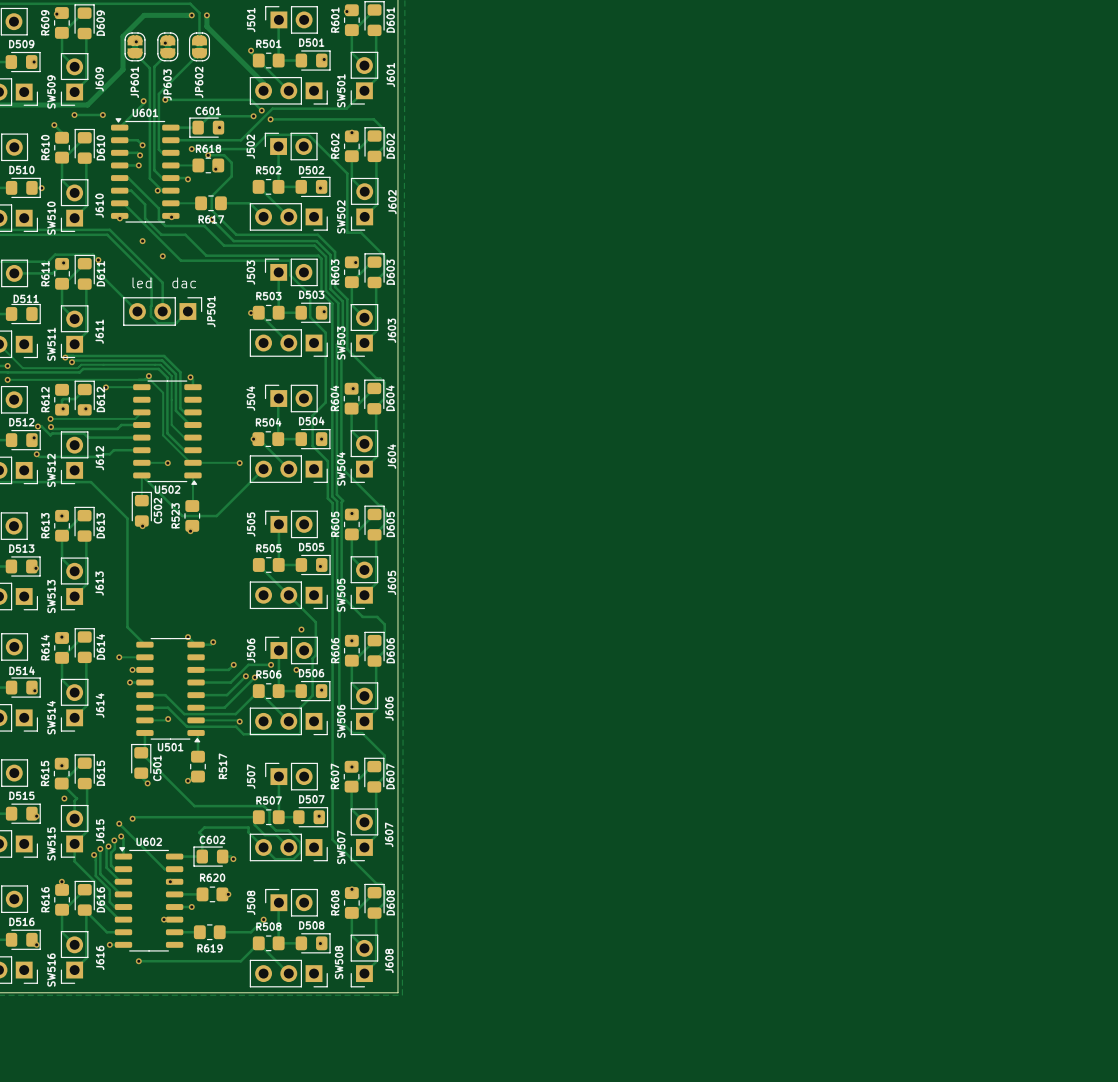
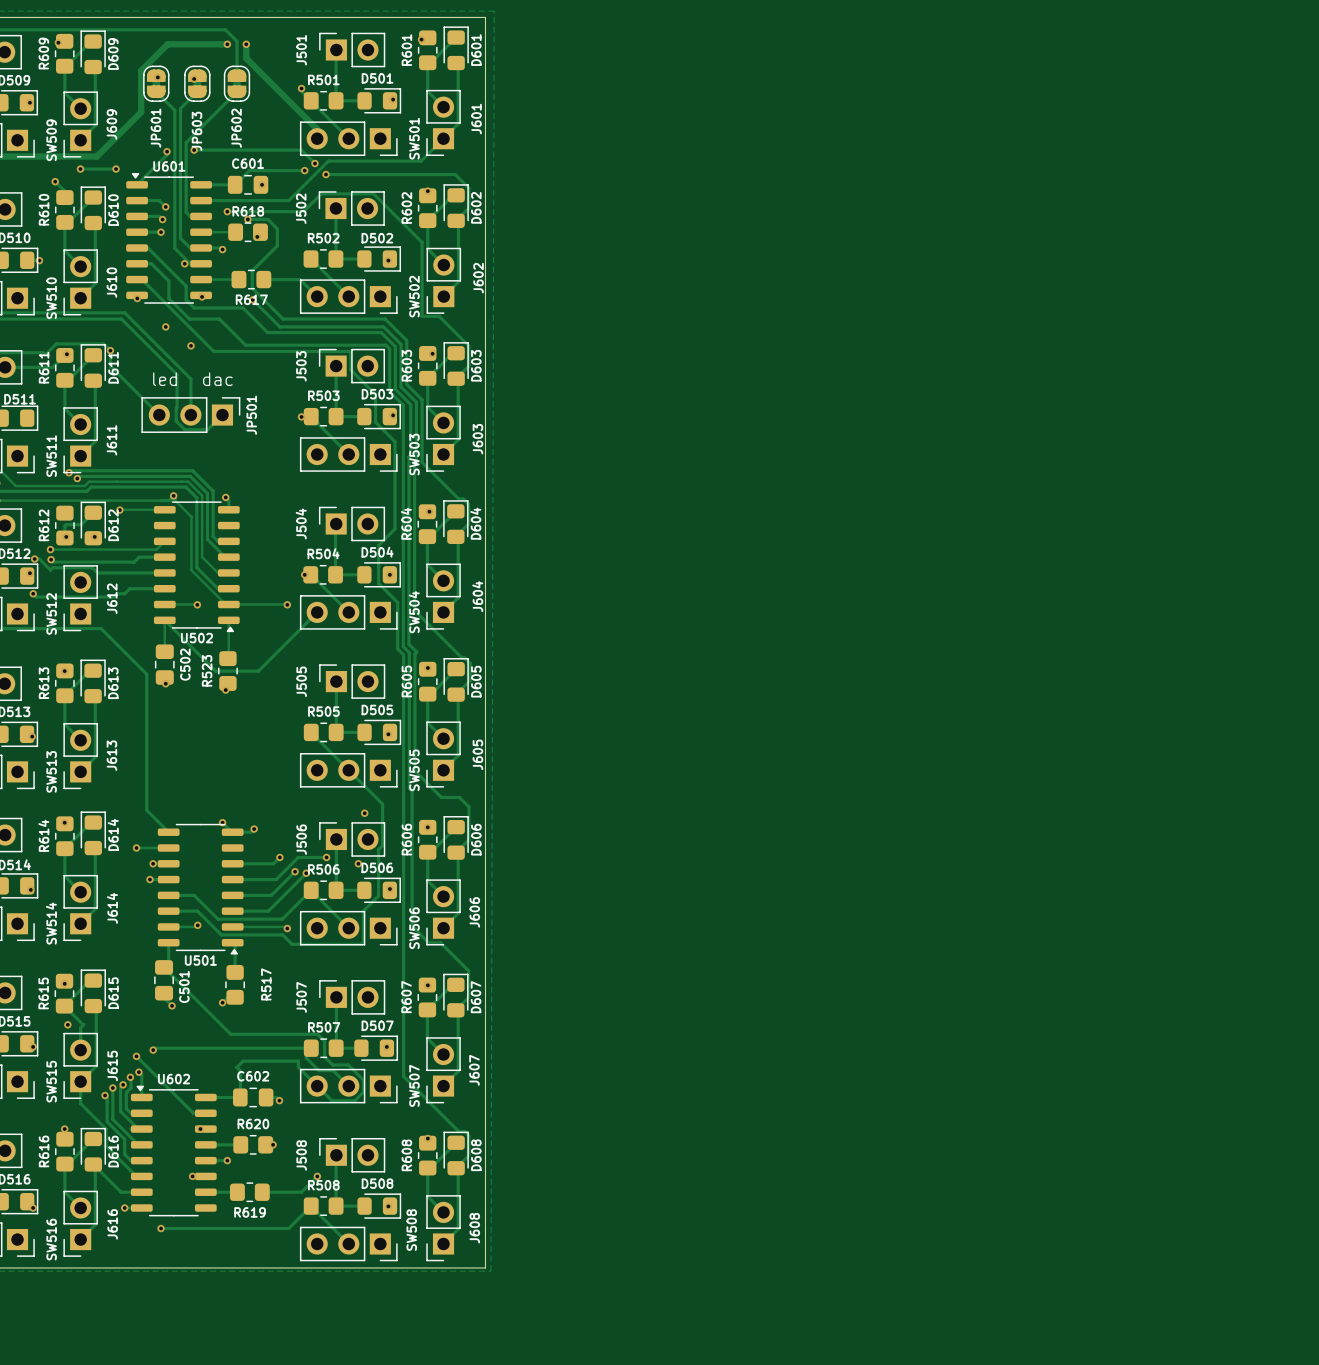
C601 footprint: [189, 117, 225, 138] -> [227, 174, 269, 195]
C502 footprint: [131, 491, 152, 527] -> [154, 644, 175, 685]
C501 footprint: [131, 743, 152, 779] -> [154, 960, 174, 1001]
C602 footprint: [193, 846, 229, 867] -> [233, 1087, 274, 1108]

